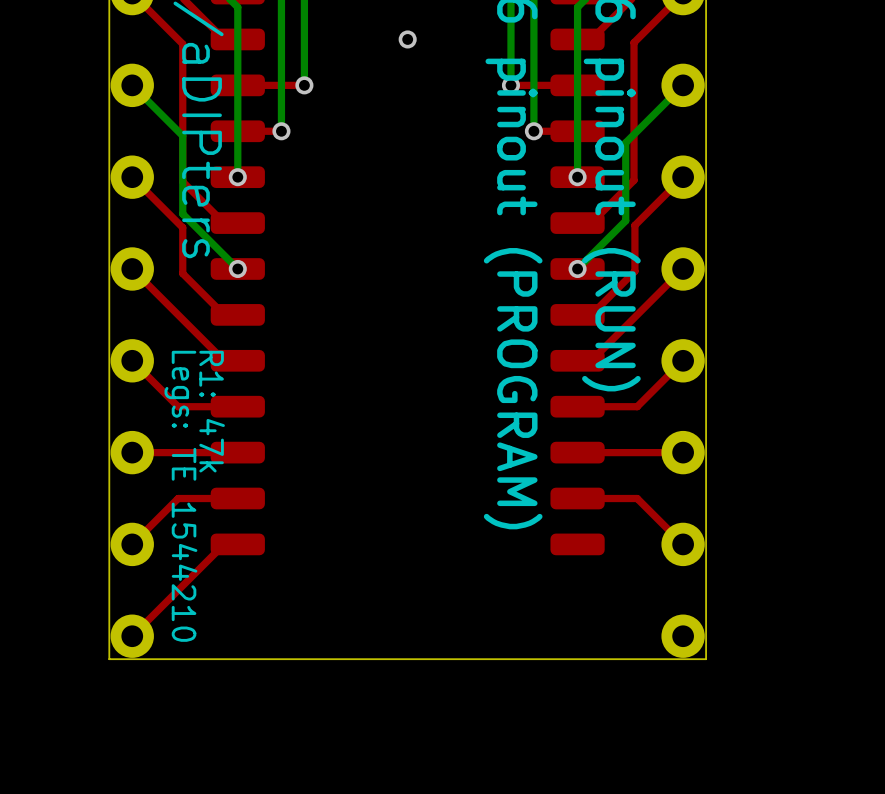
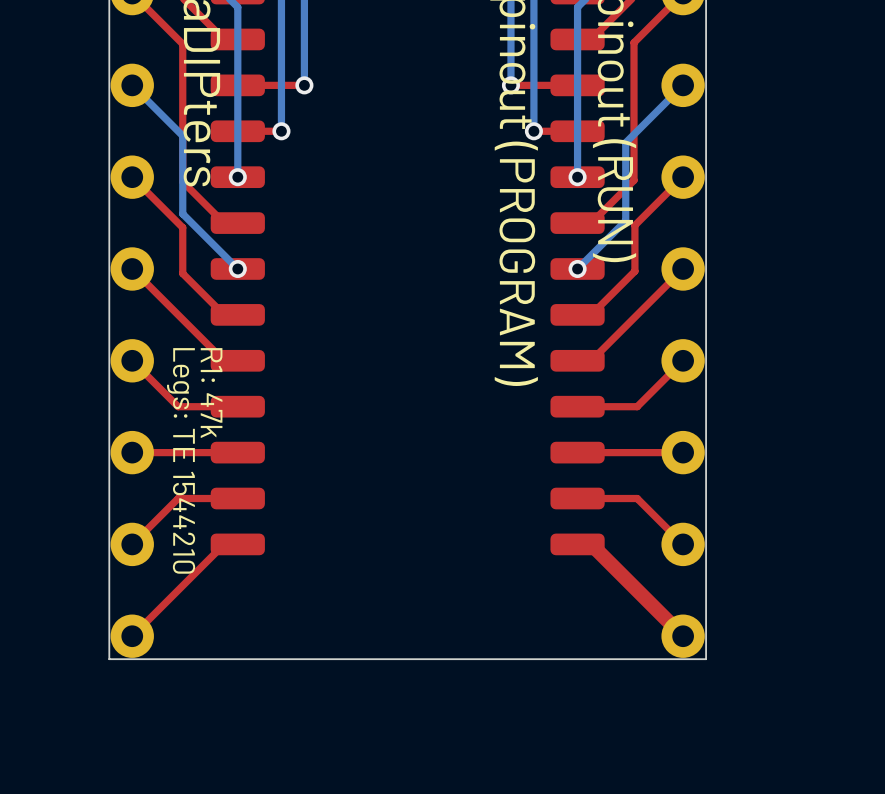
via: (407, 39) -> none
top track: none -> (577, 544) (591, 544) (683, 636)

